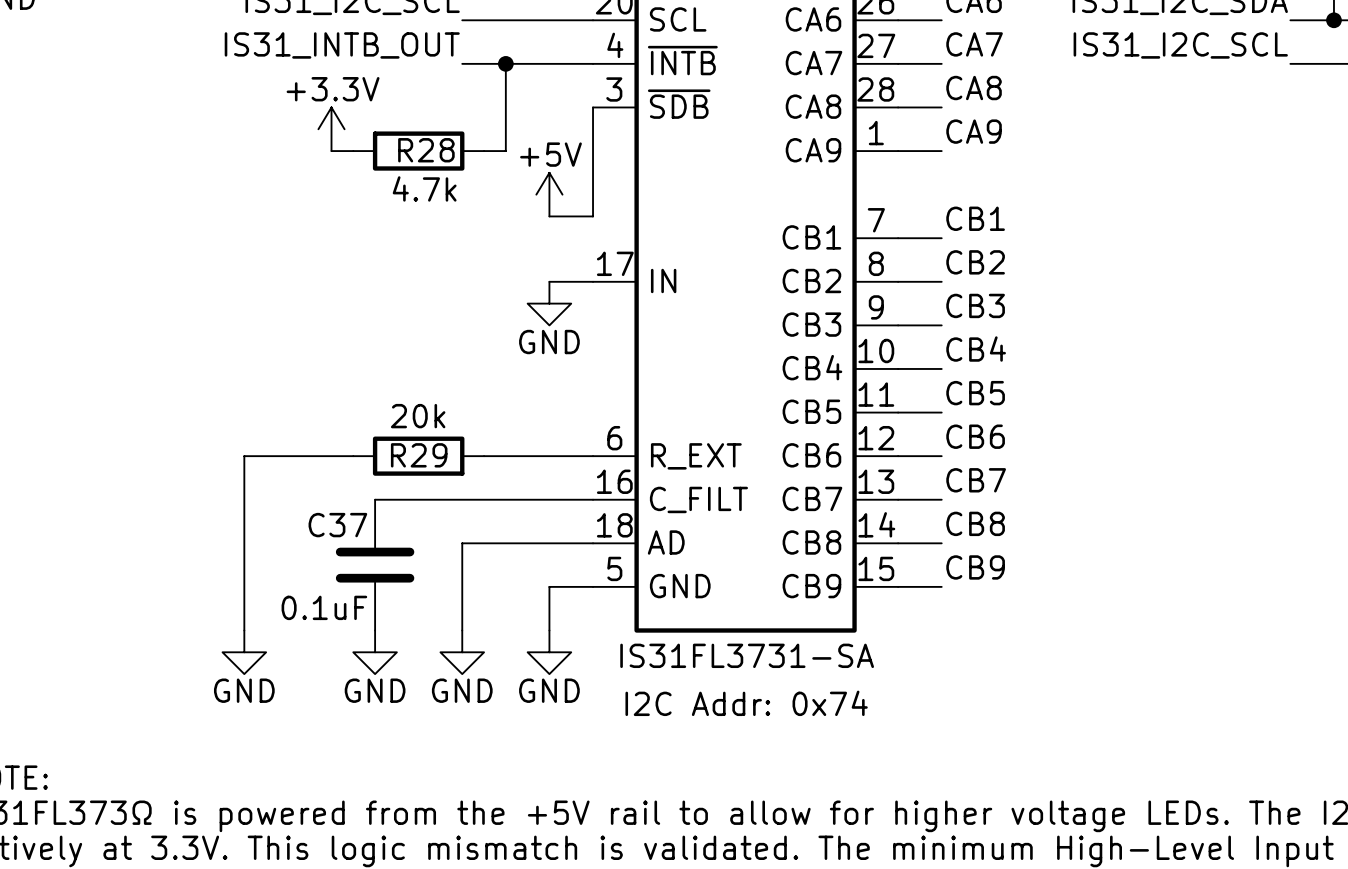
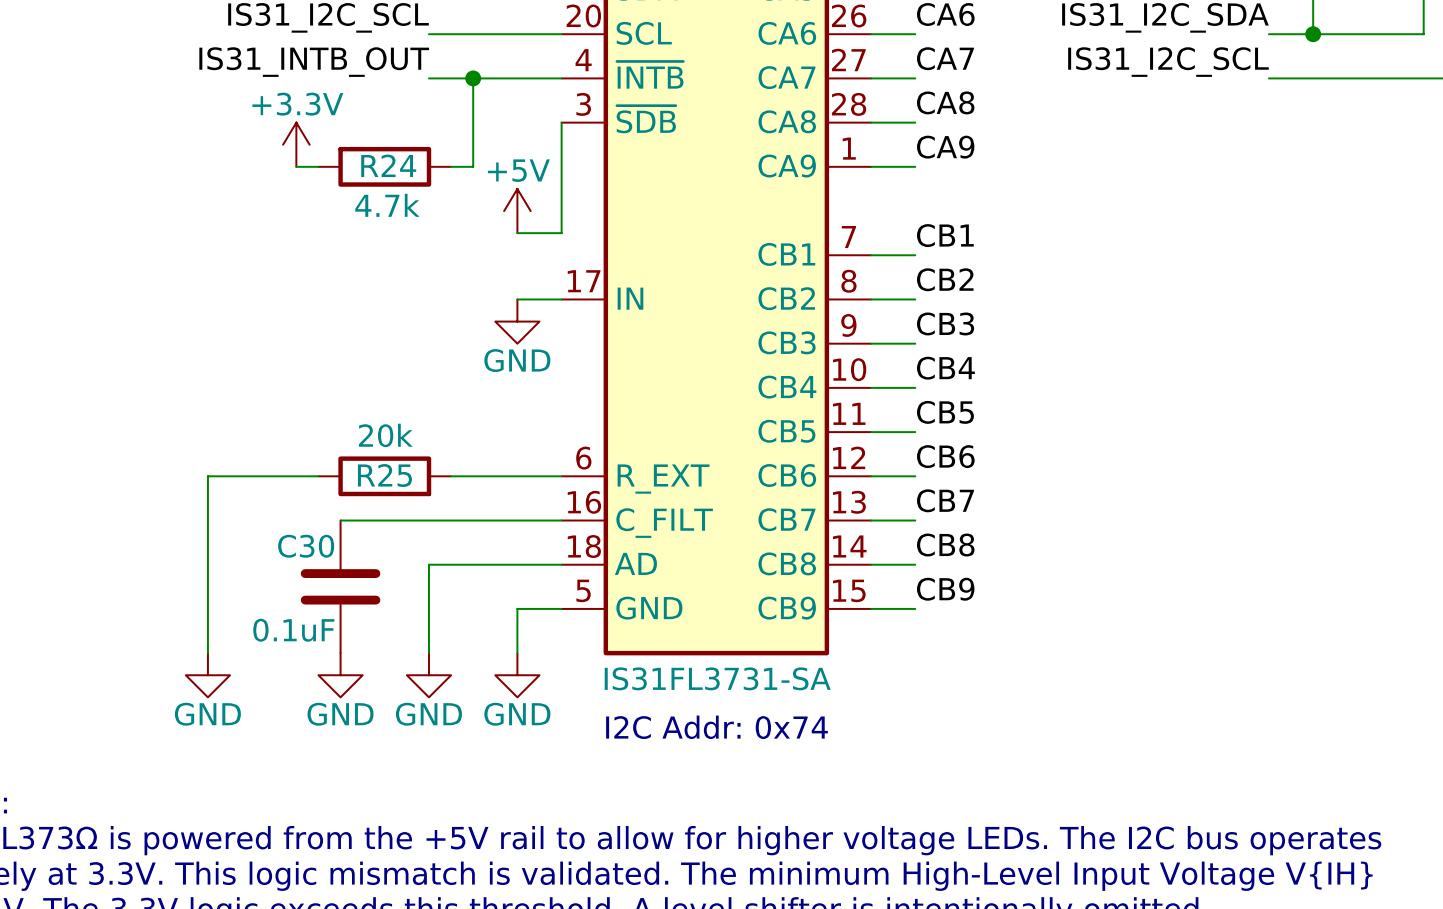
R28 name: R28 (426, 150) -> R24 (388, 165)
R29 name: R29 (419, 455) -> R25 (384, 475)
C37 name: C37 (337, 525) -> C30 (306, 546)

